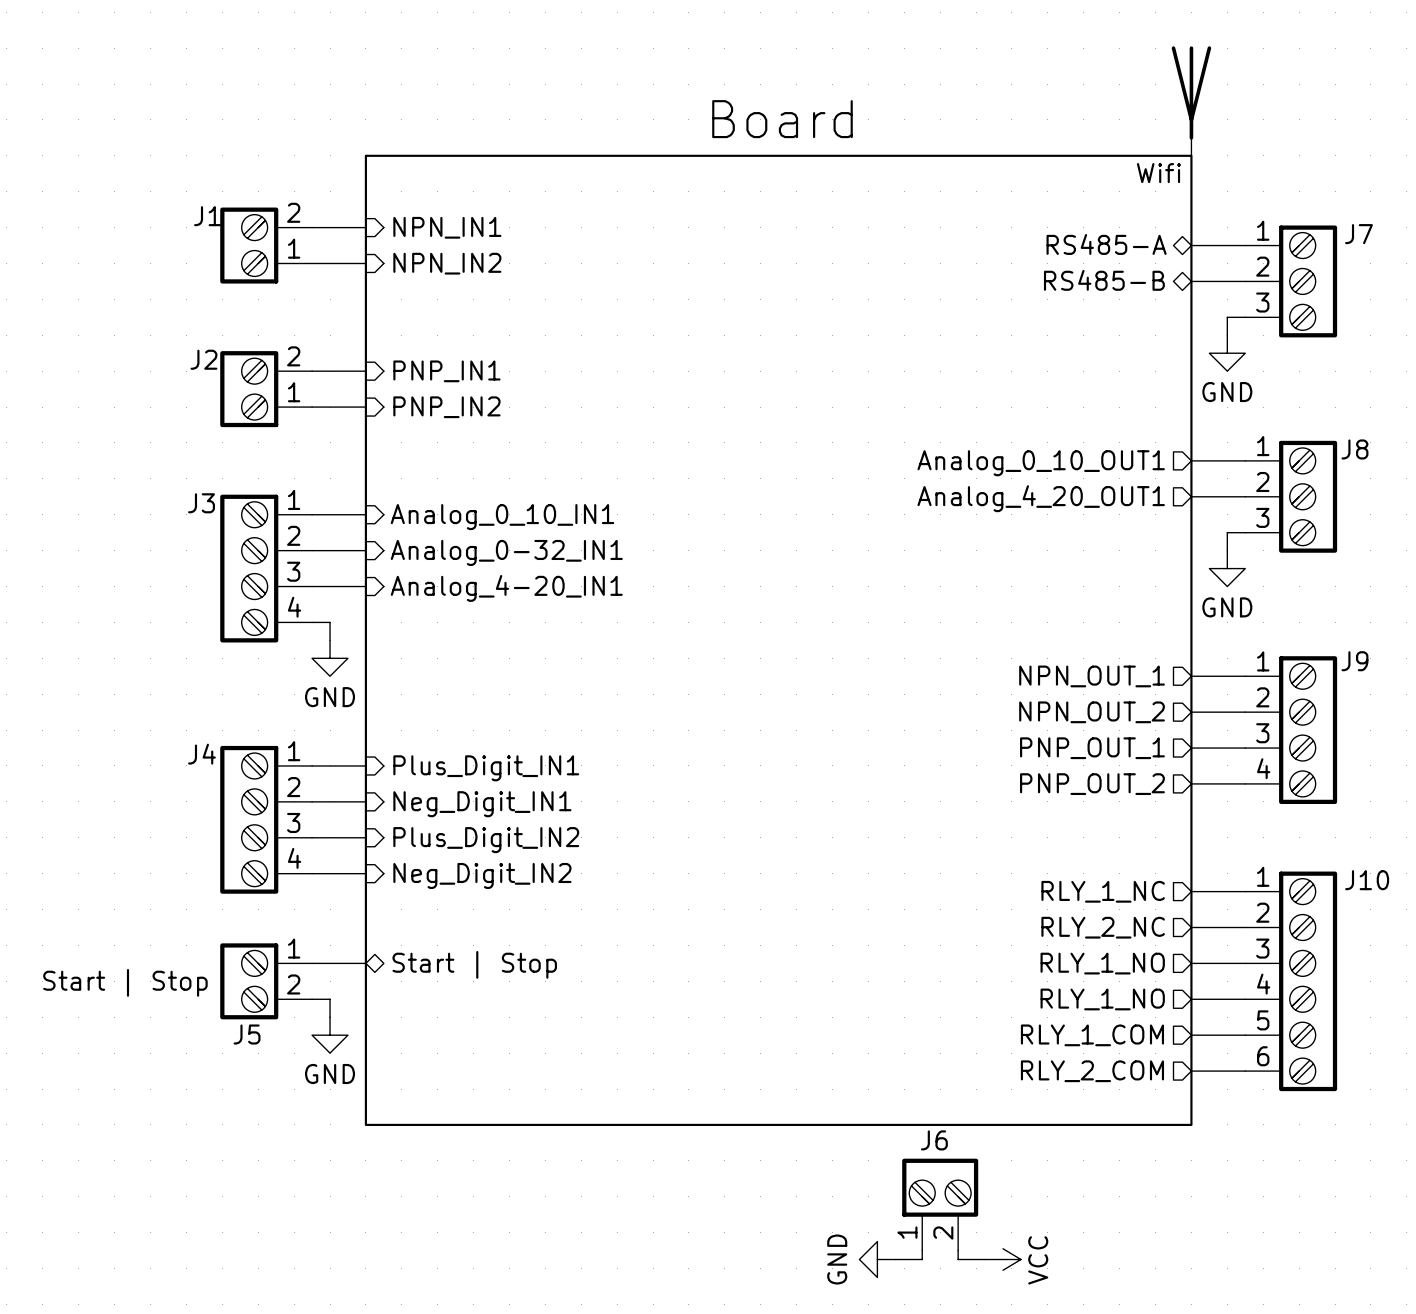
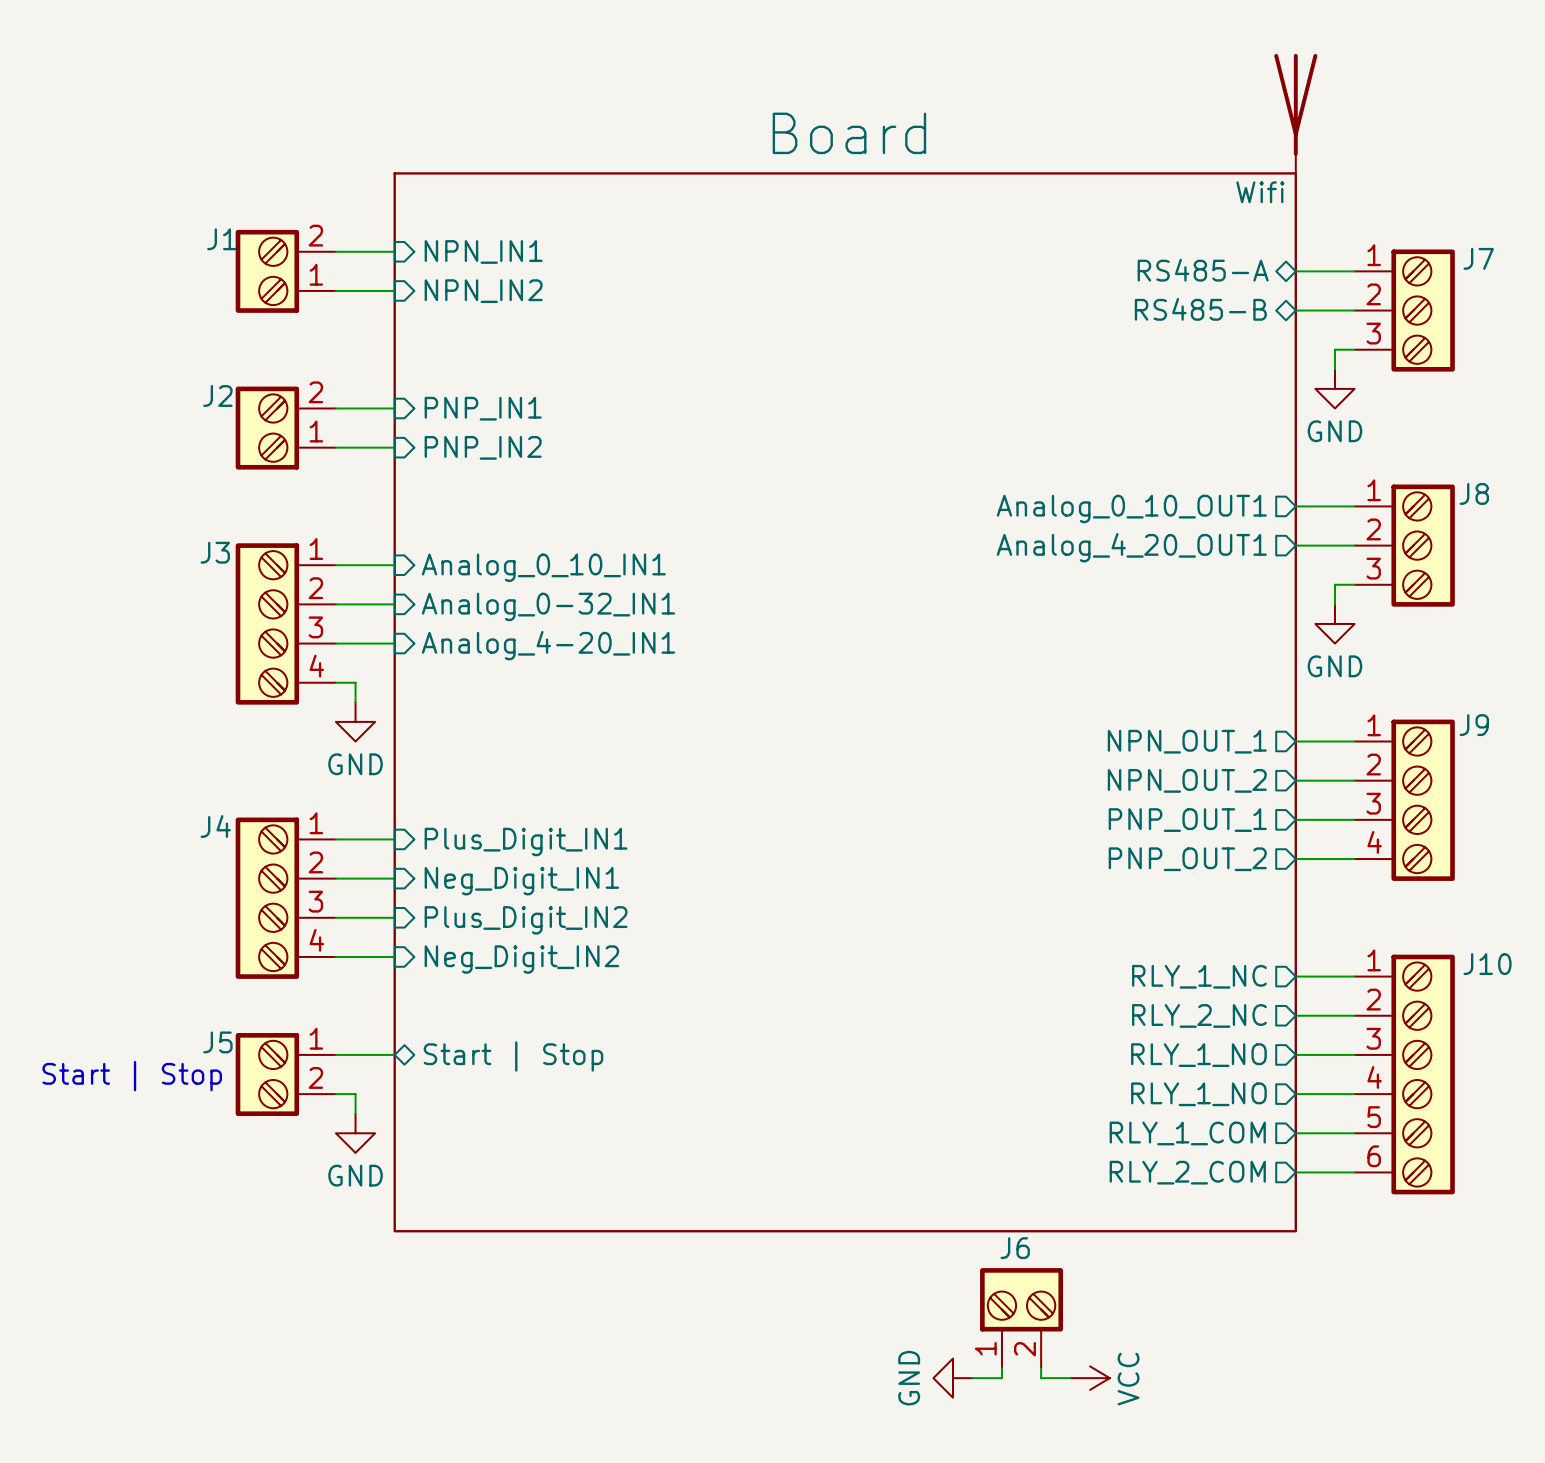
J5 name position: J5 (247, 1034) -> J5 (217, 1042)

